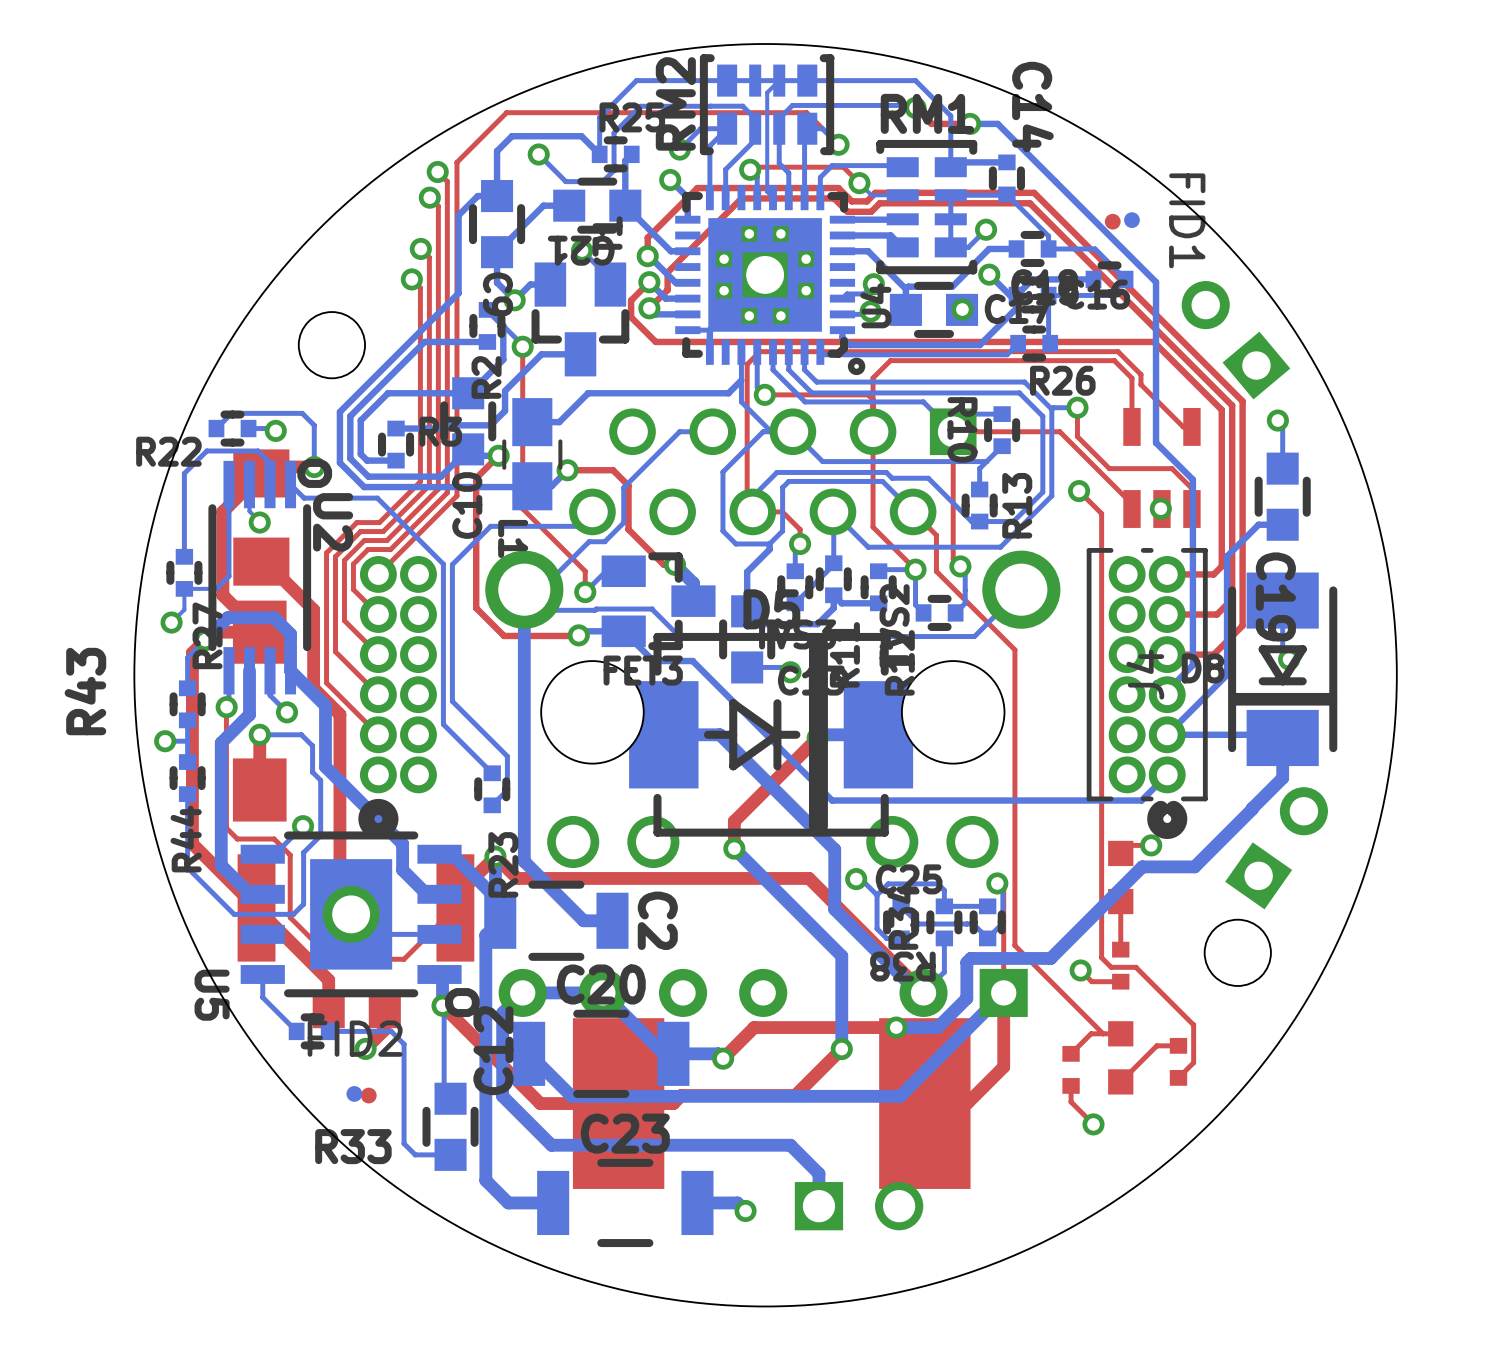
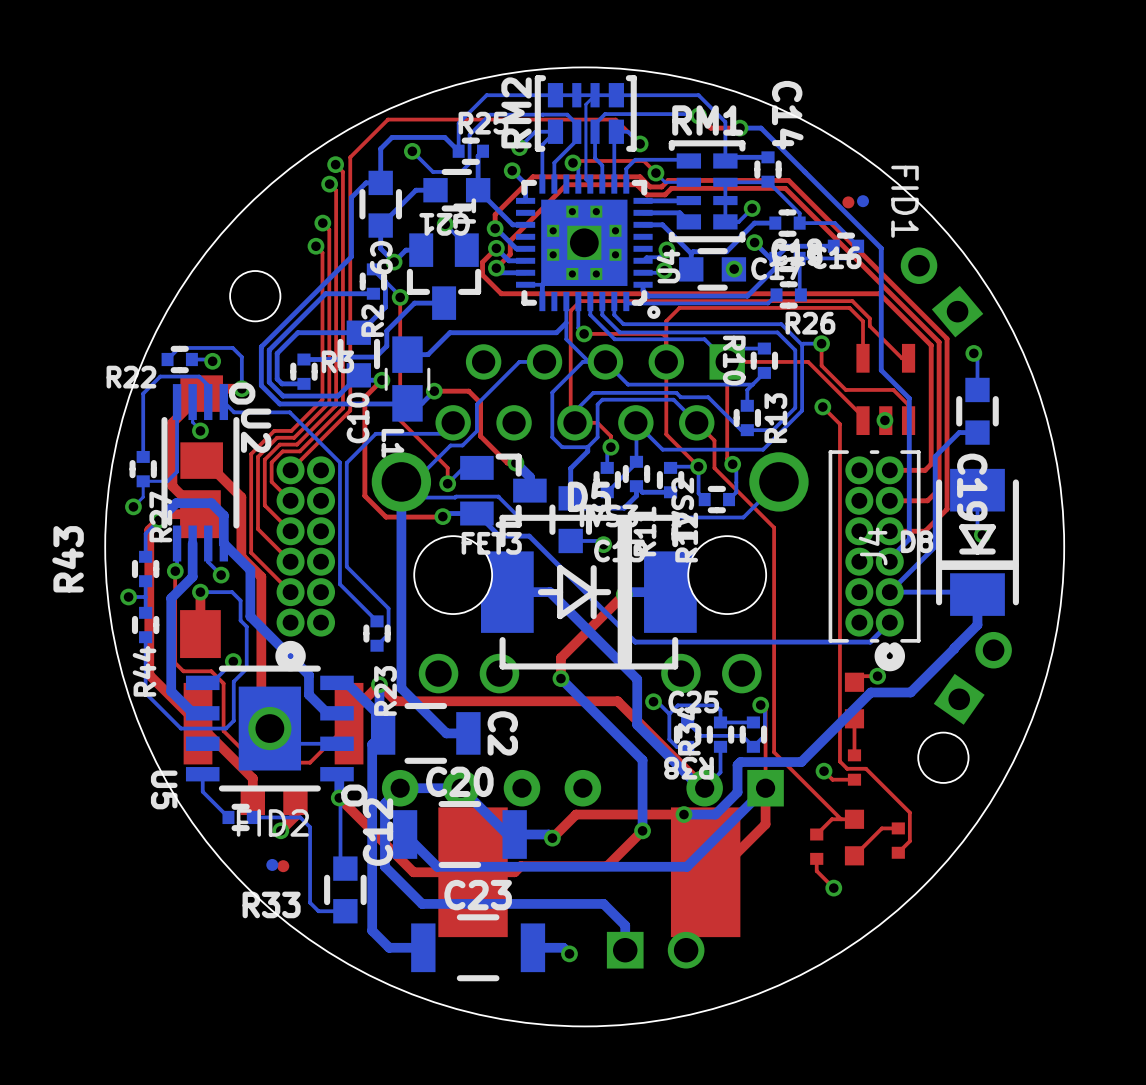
top track: (1003, 1040) (1003, 1066) (967, 1103) (924, 1103) -> (765, 824) (717, 872)

